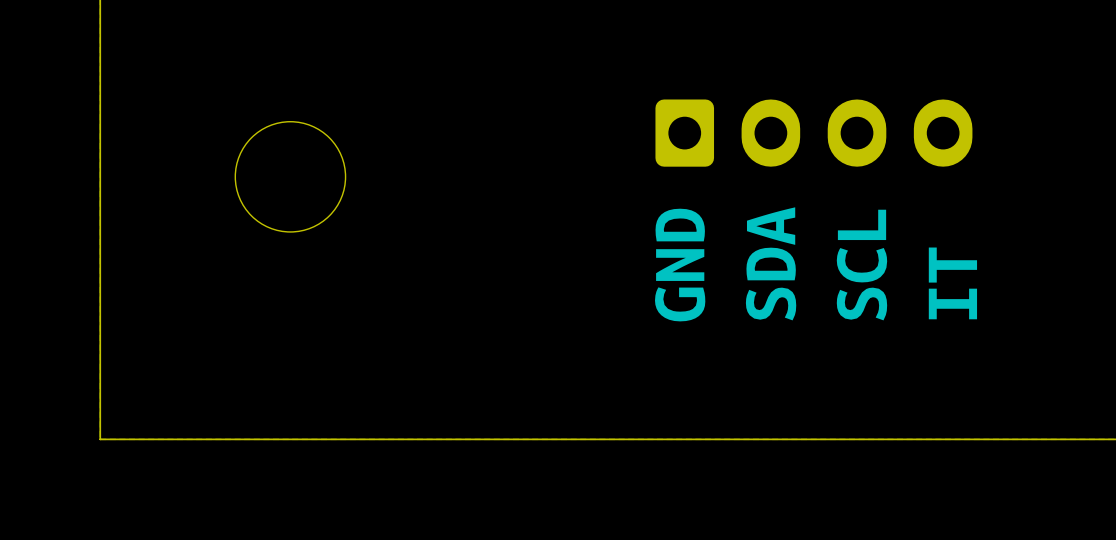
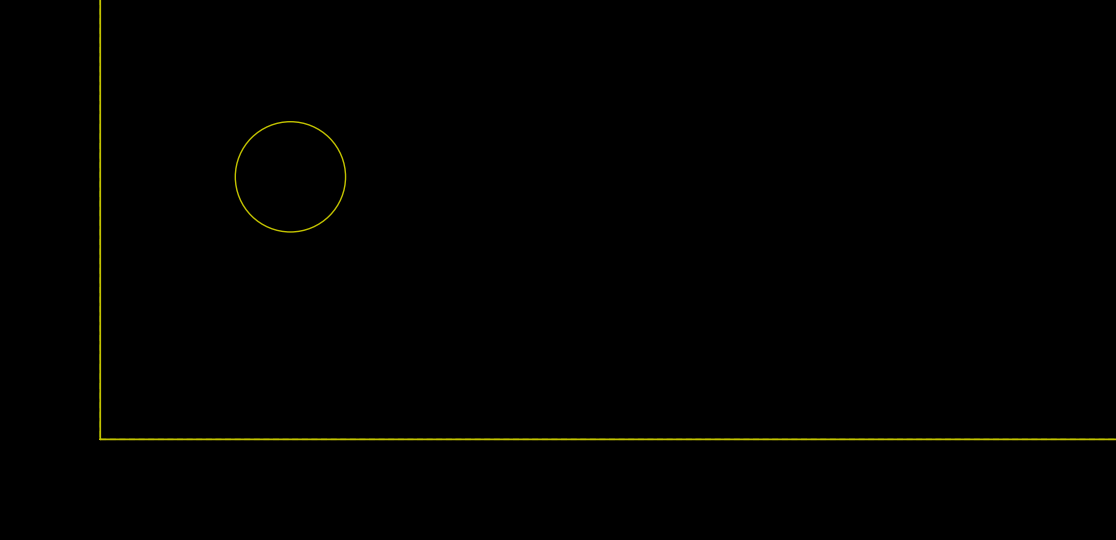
part: (813, 133) -> none
drawing: [654, 207, 978, 322] -> none

